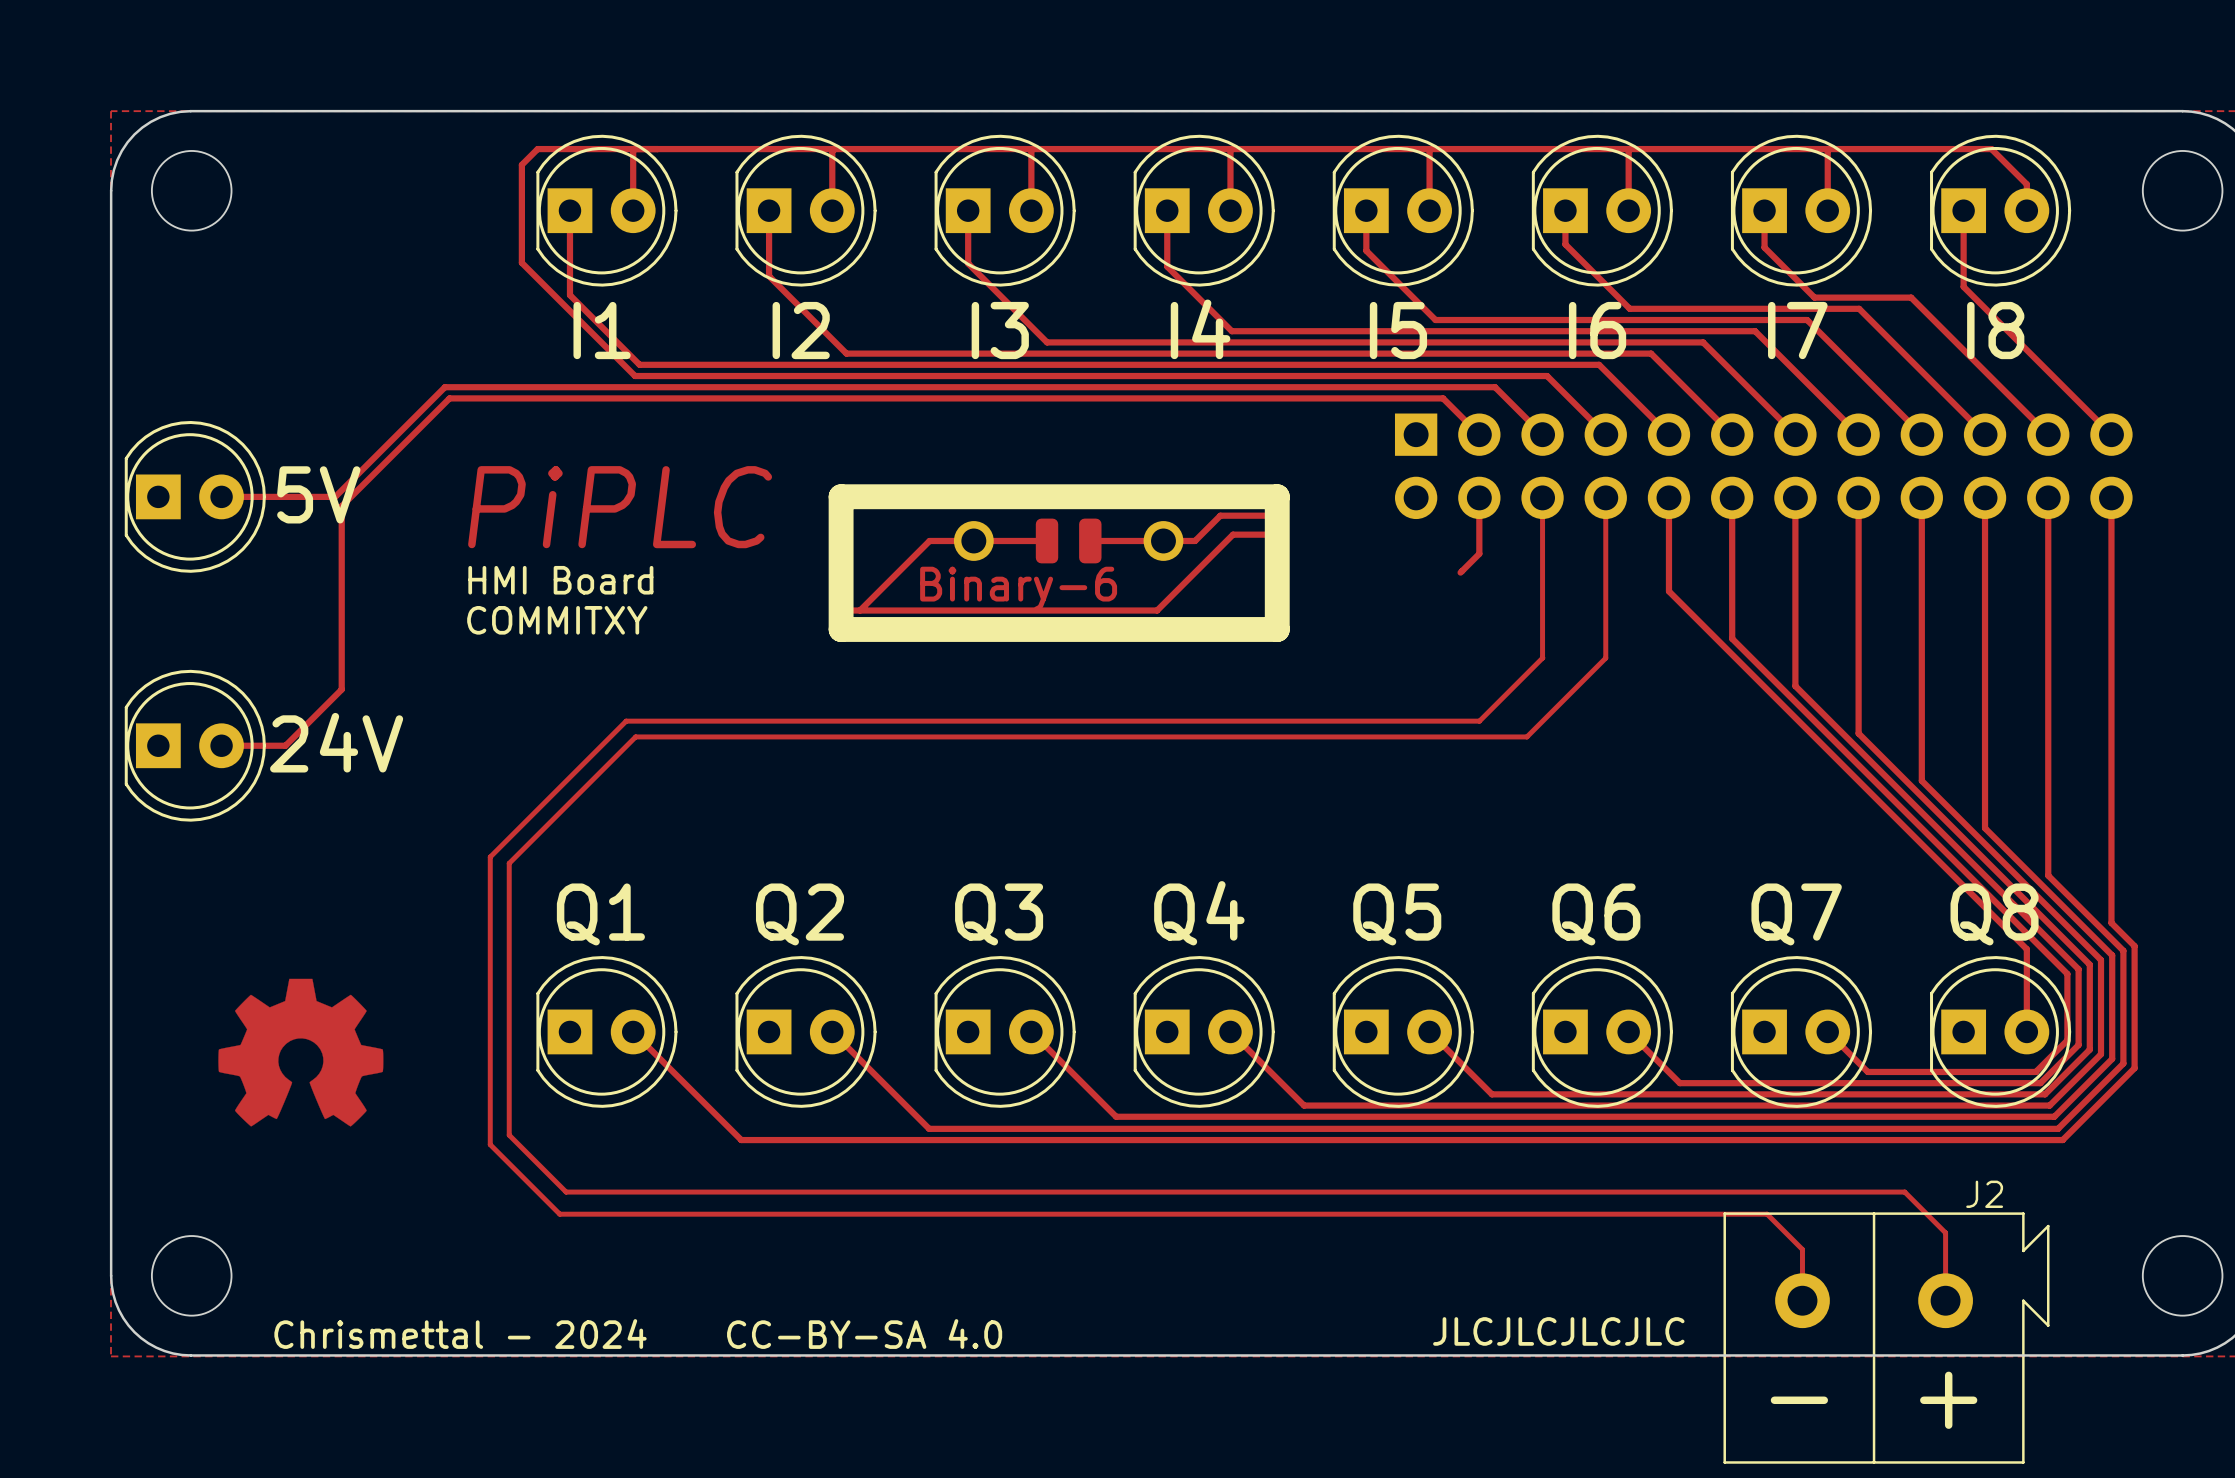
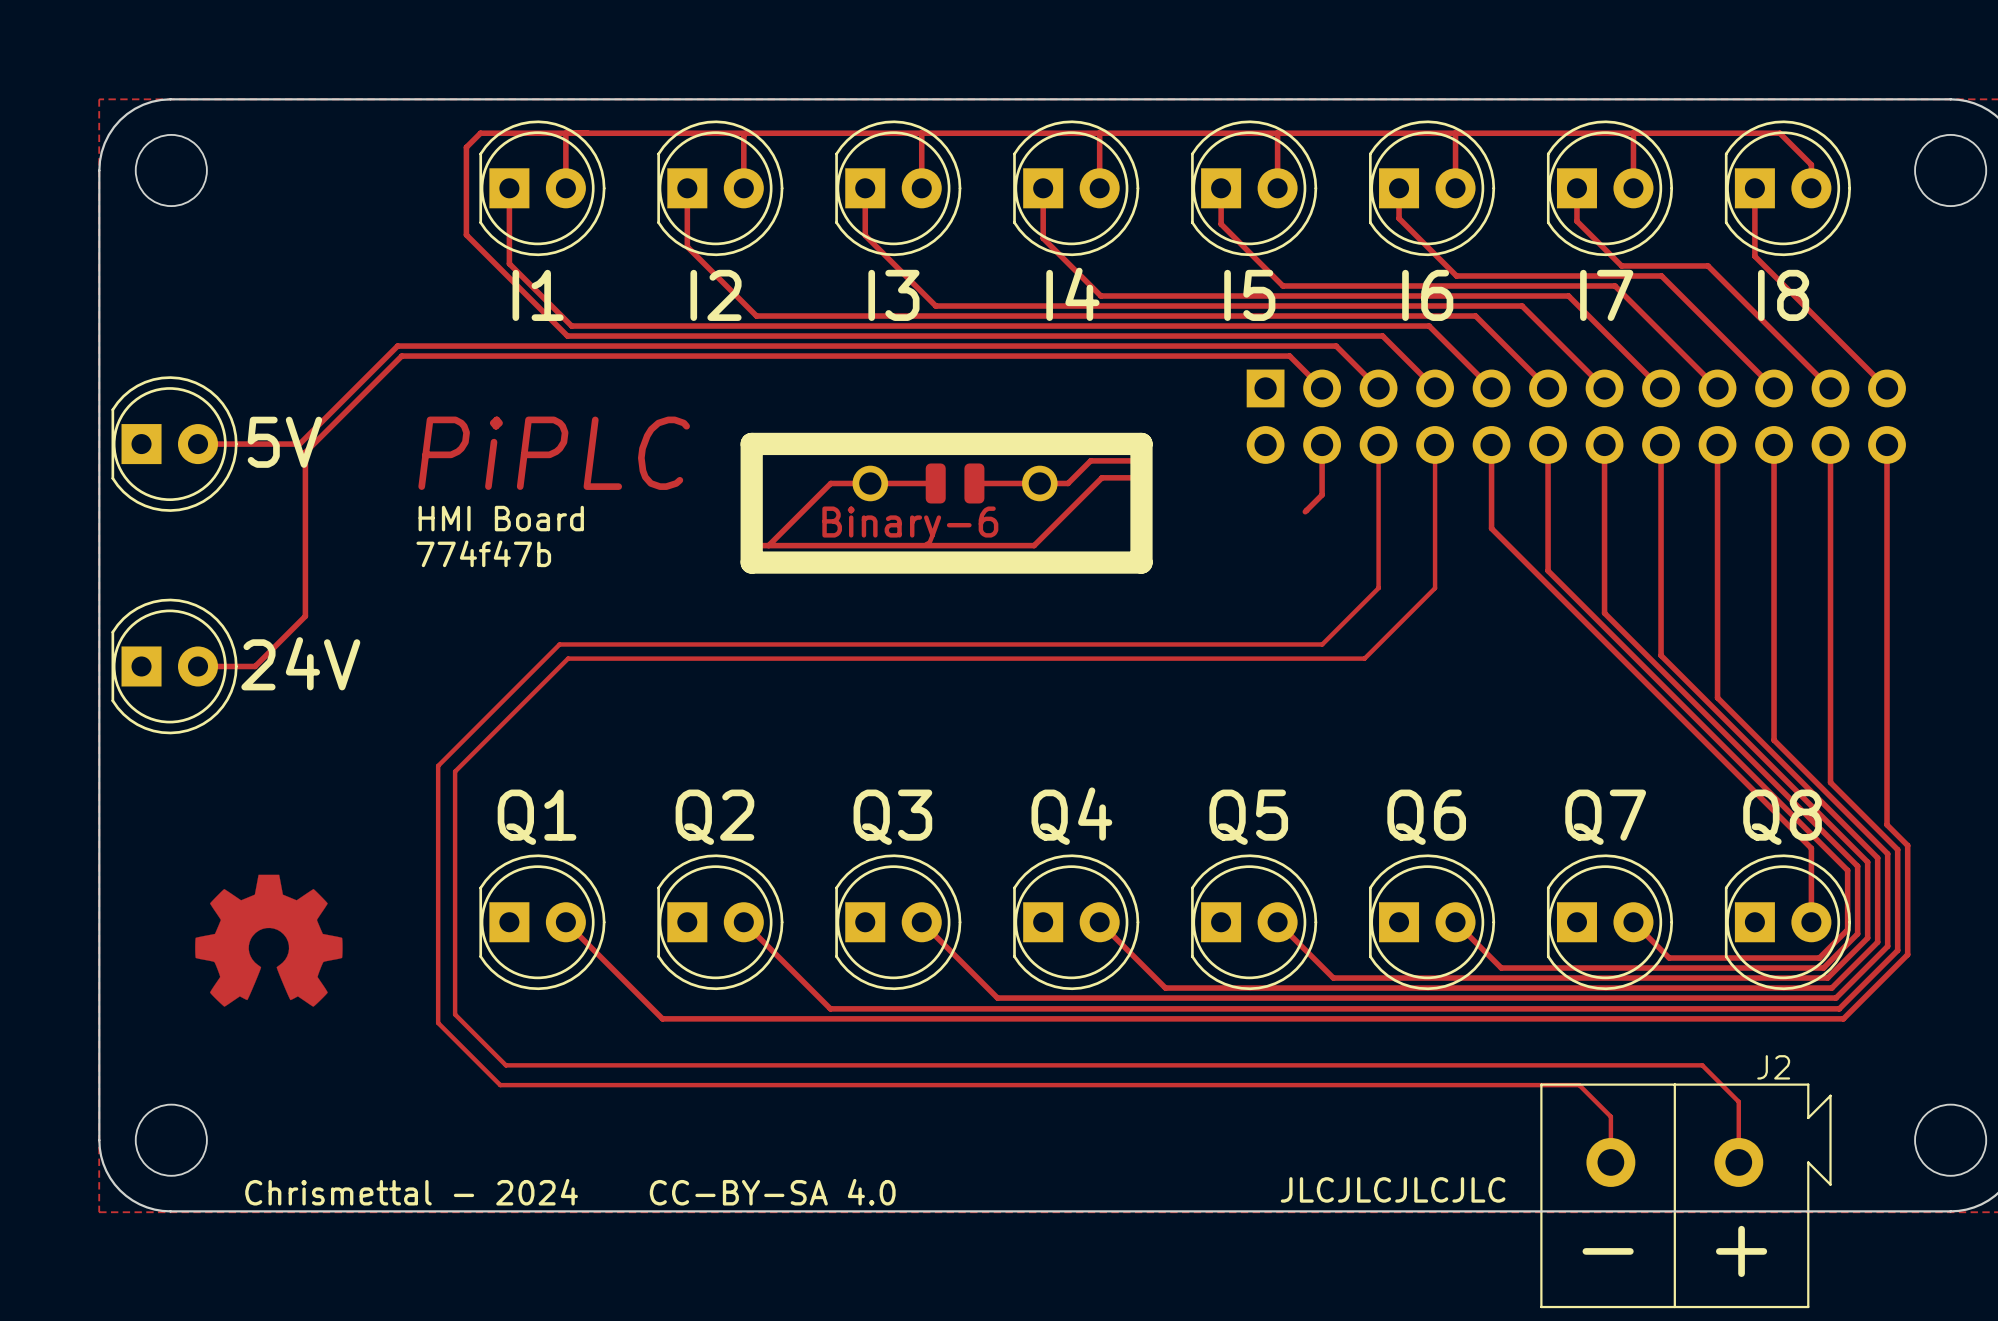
text: COMMITXY (557, 620) -> 774f47b (483, 553)

